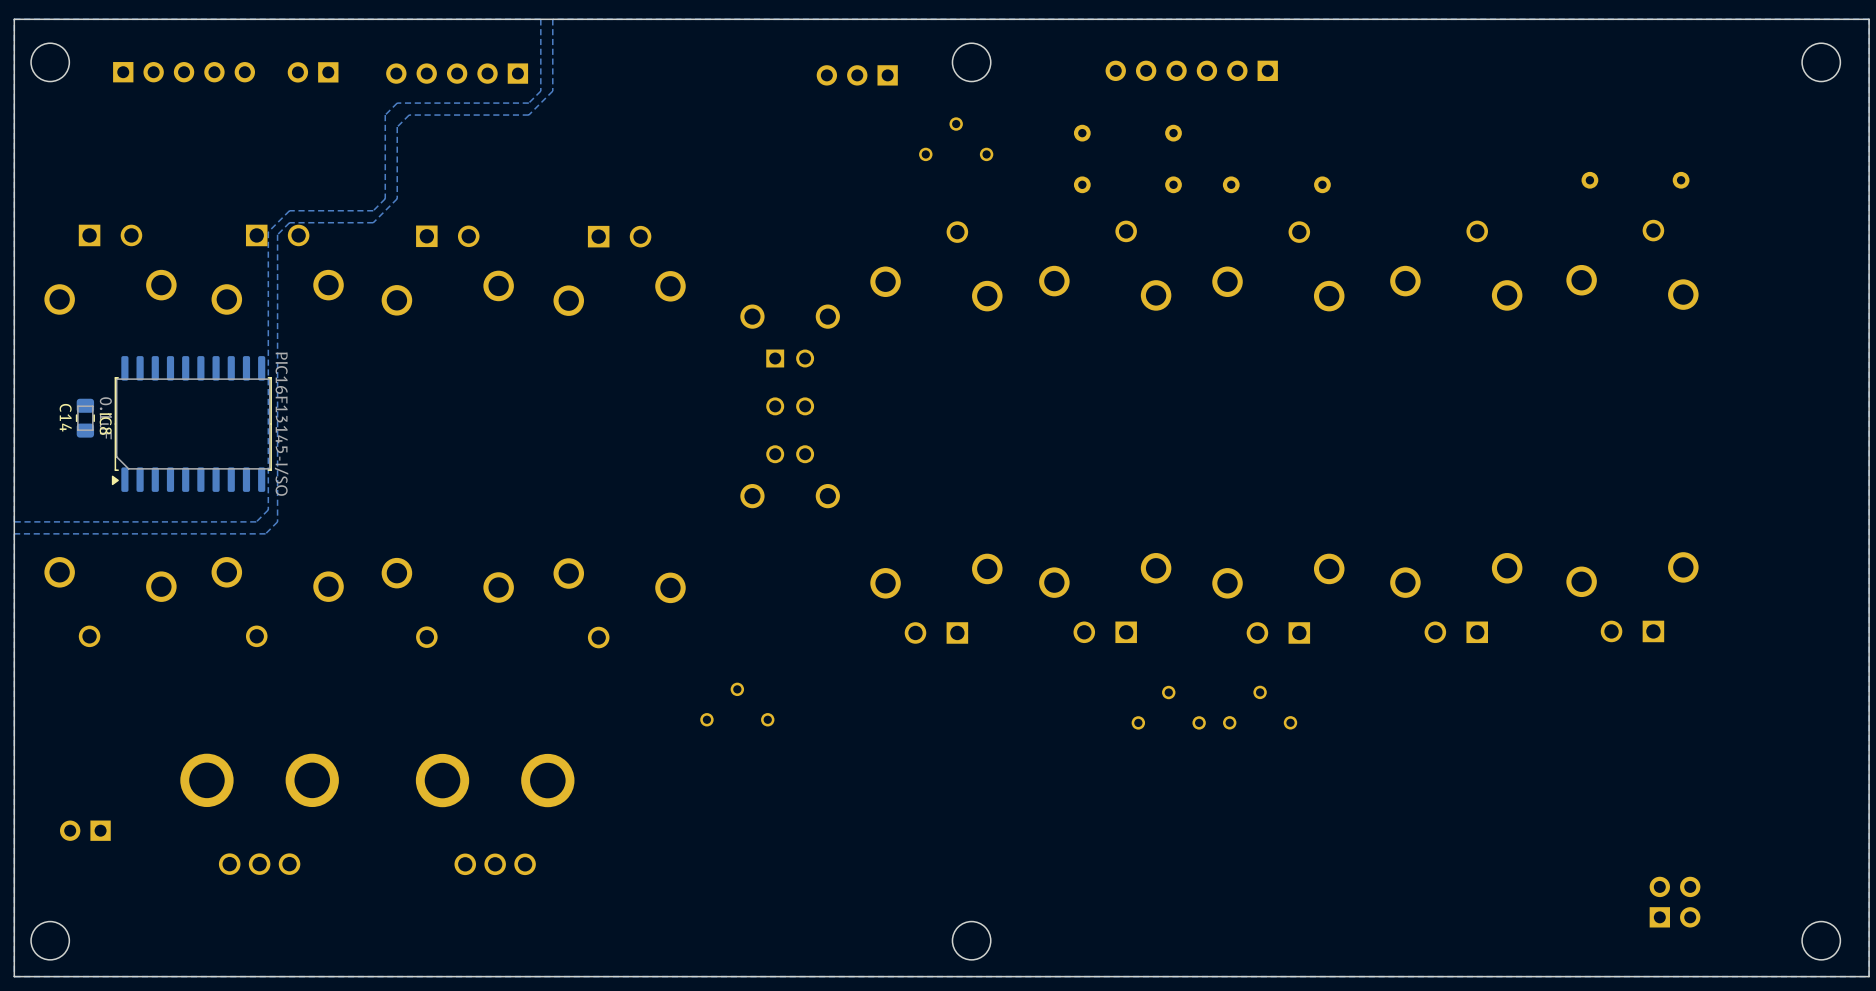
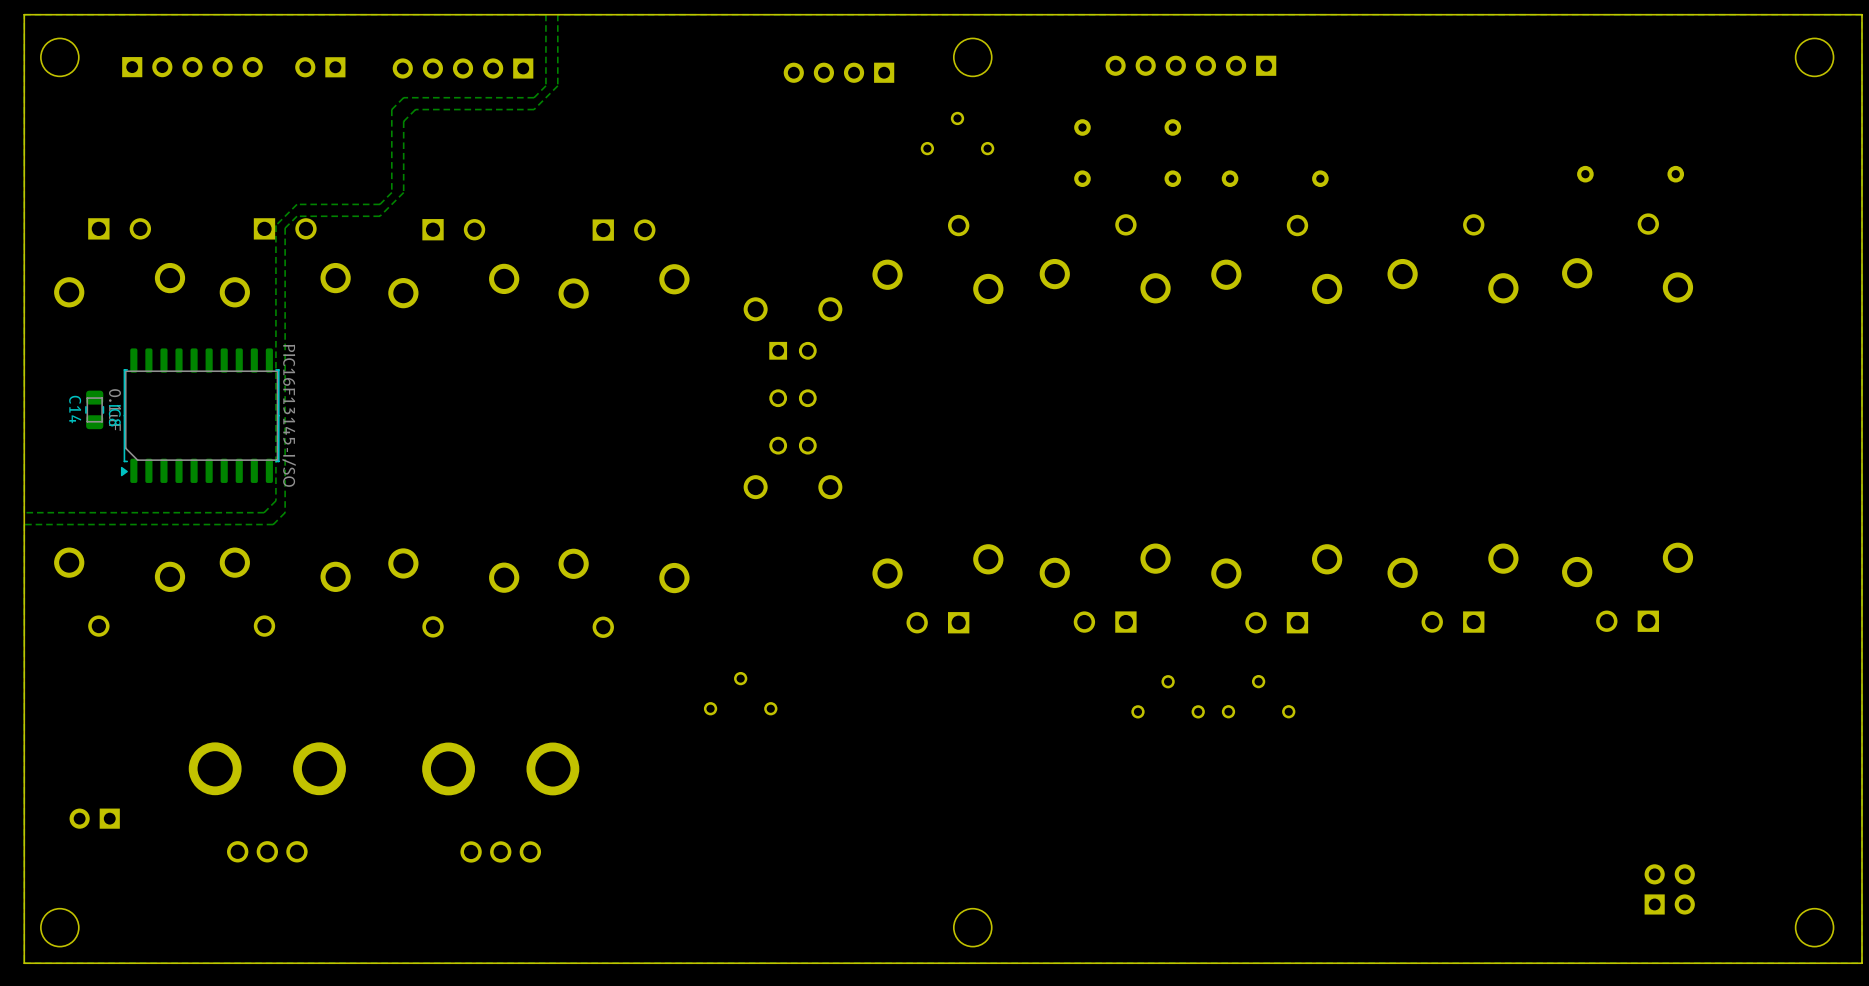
part: (857, 75) -> none
part: none -> (838, 72)

